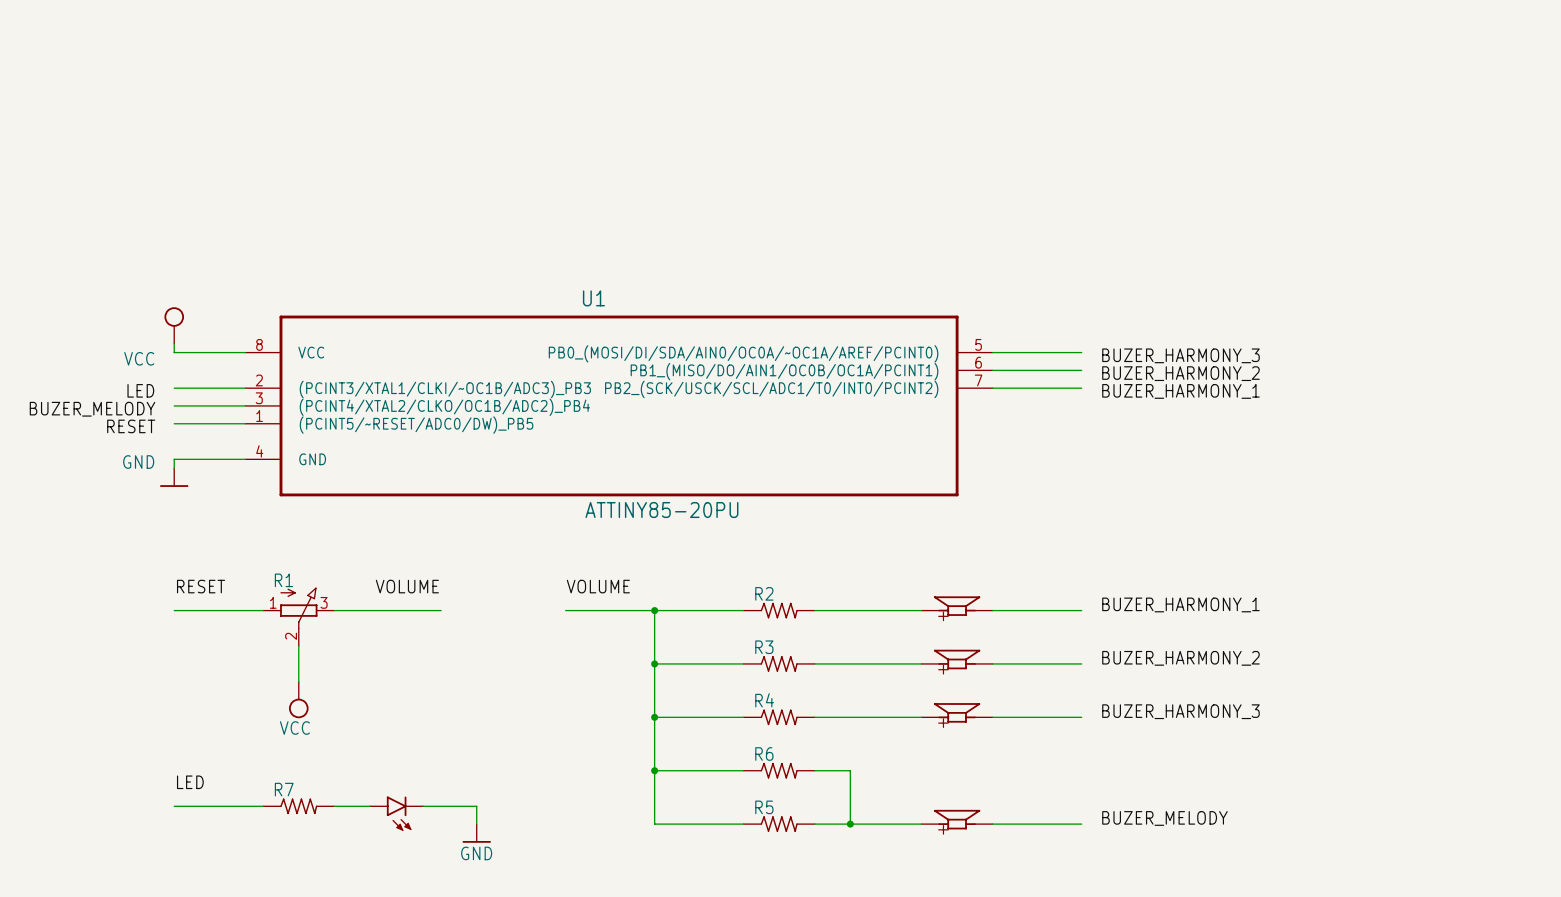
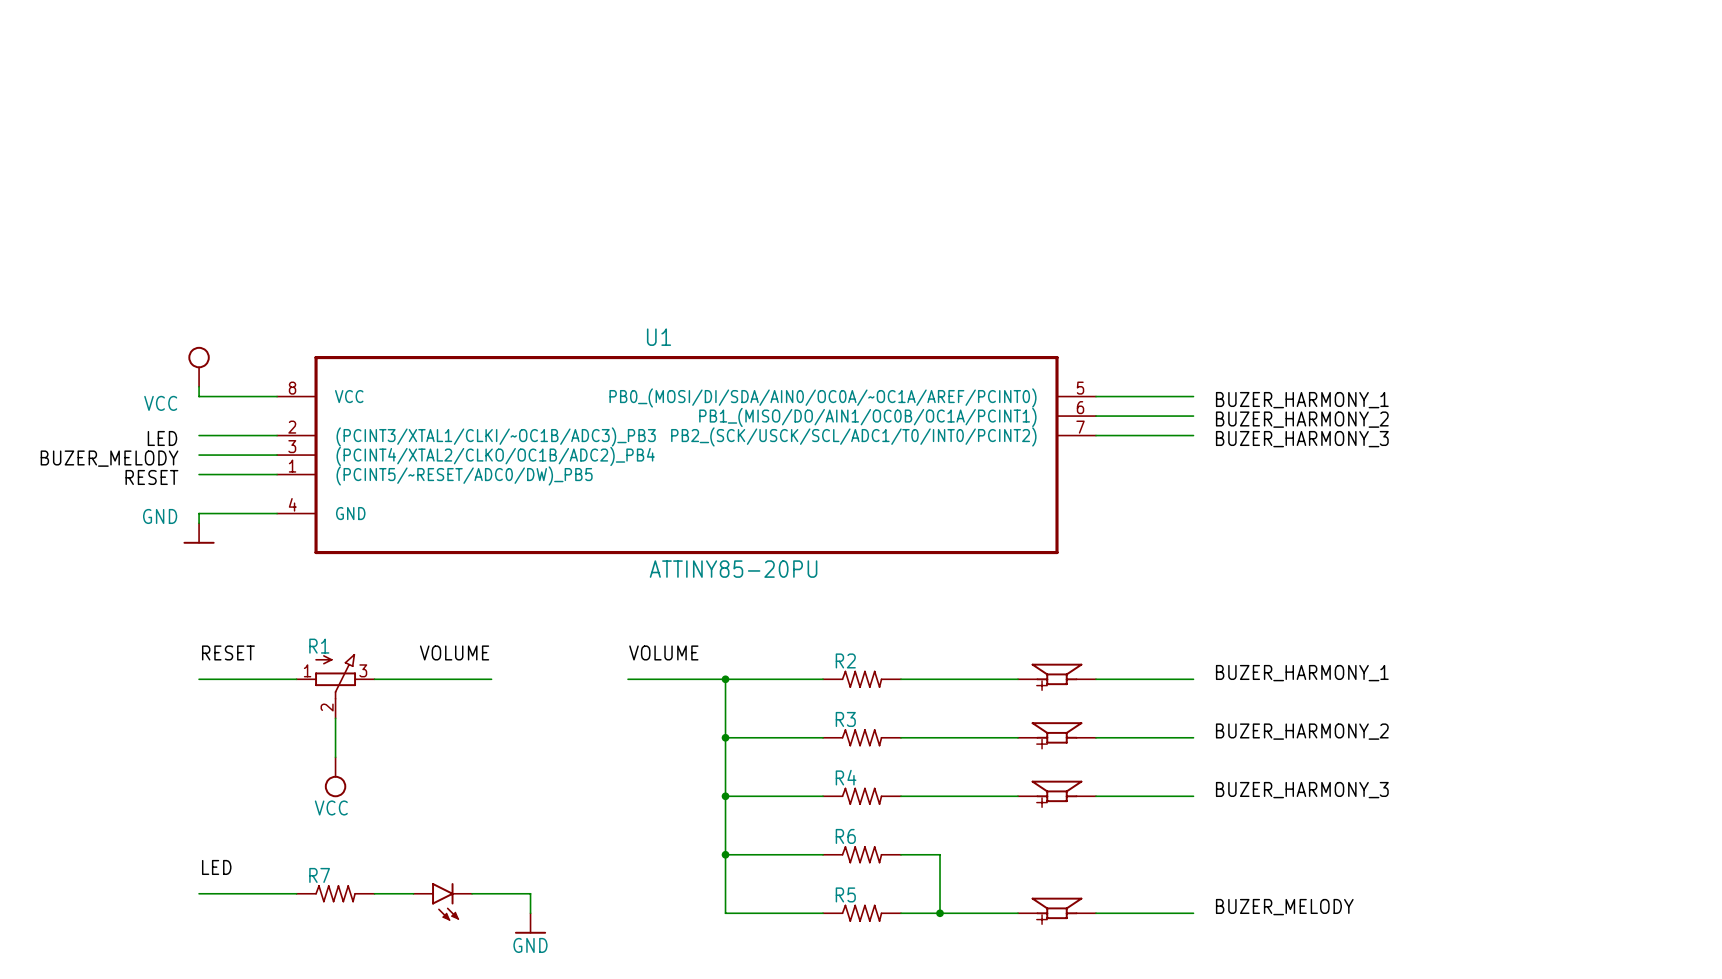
label: BUZER_HARMONY_3 (1180, 355) -> BUZER_HARMONY_1 (1302, 400)
label: BUZER_HARMONY_1 (1180, 391) -> BUZER_HARMONY_3 (1302, 439)

